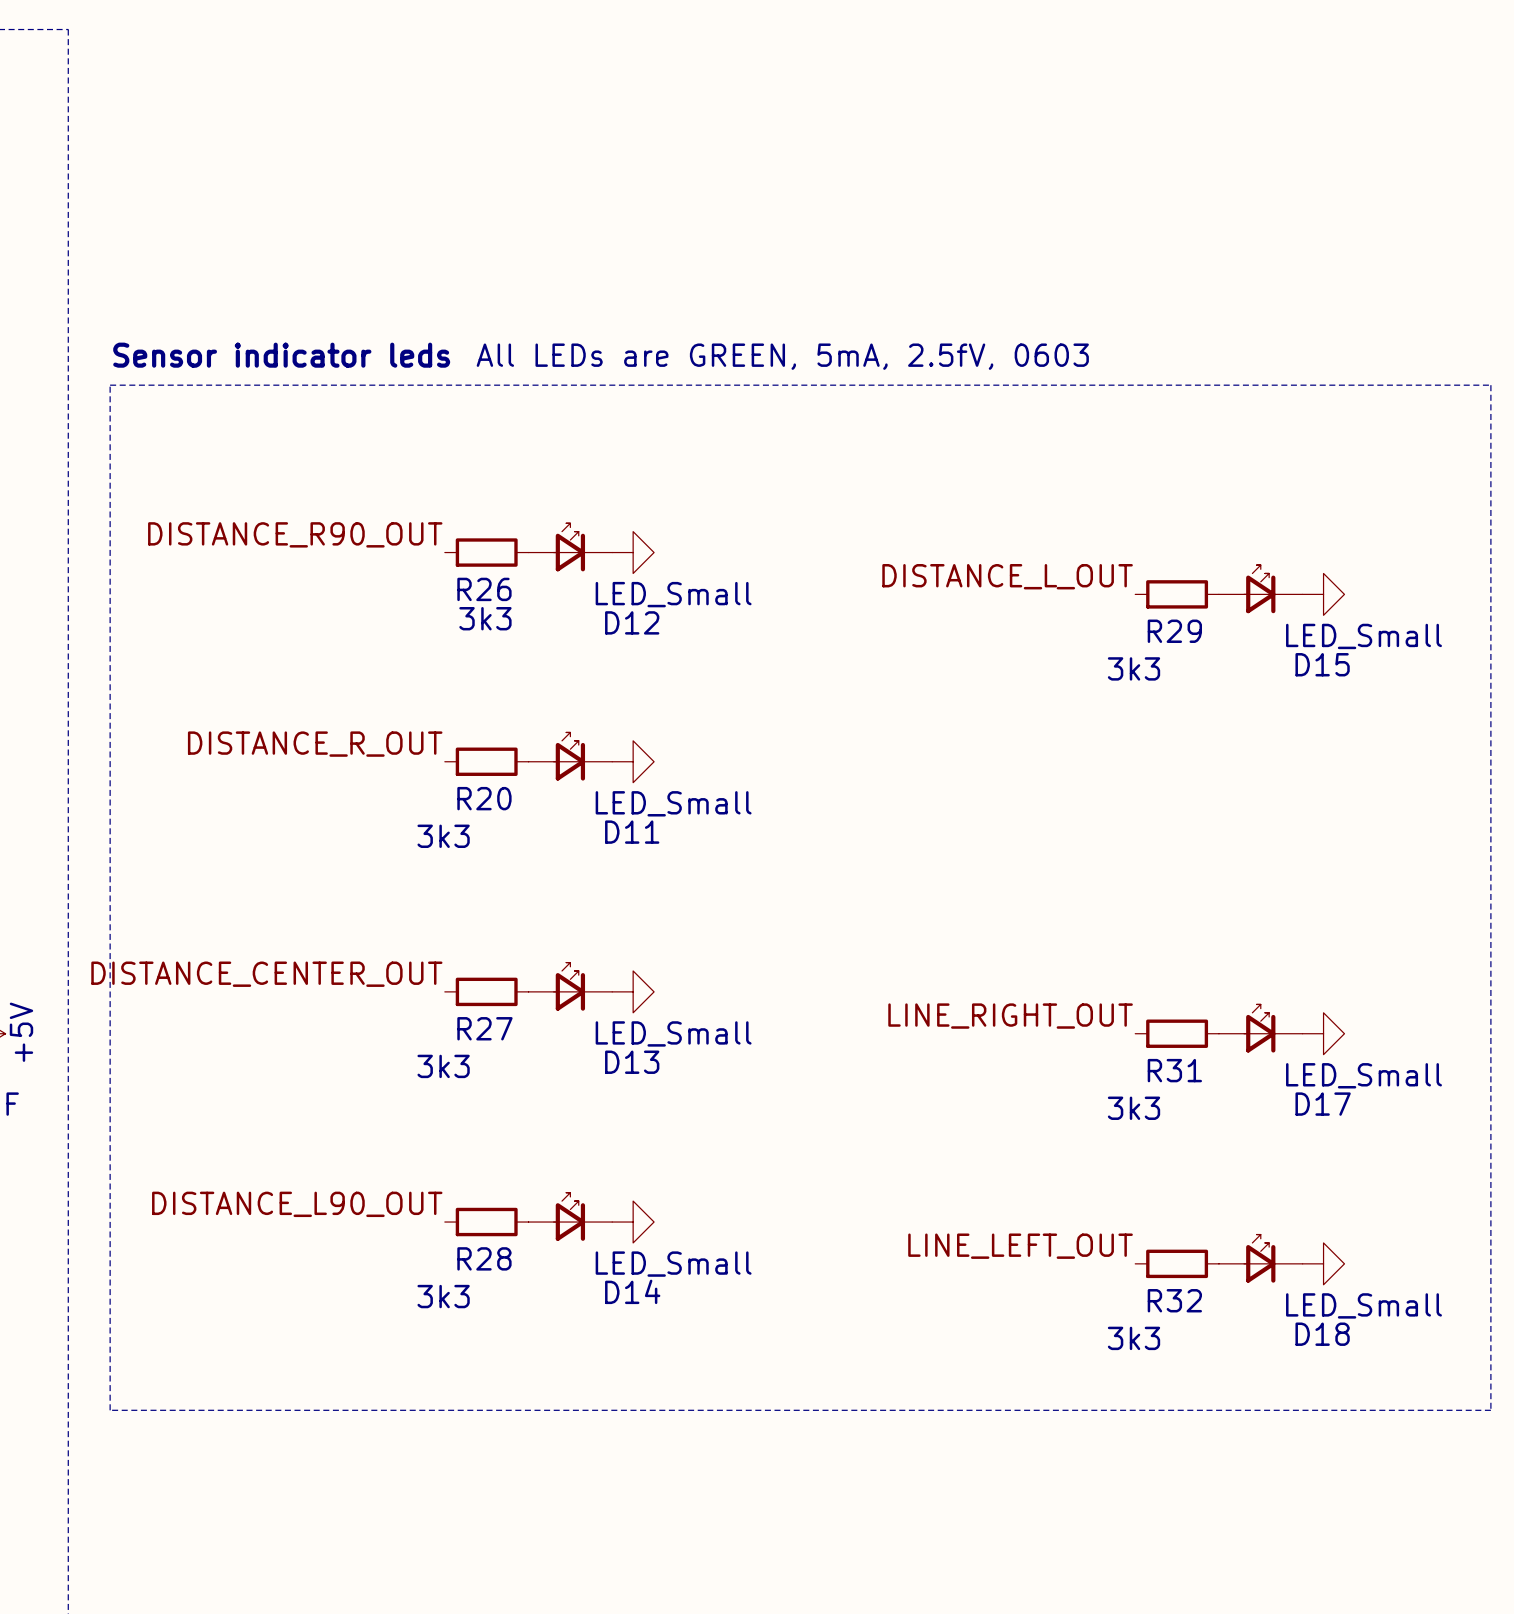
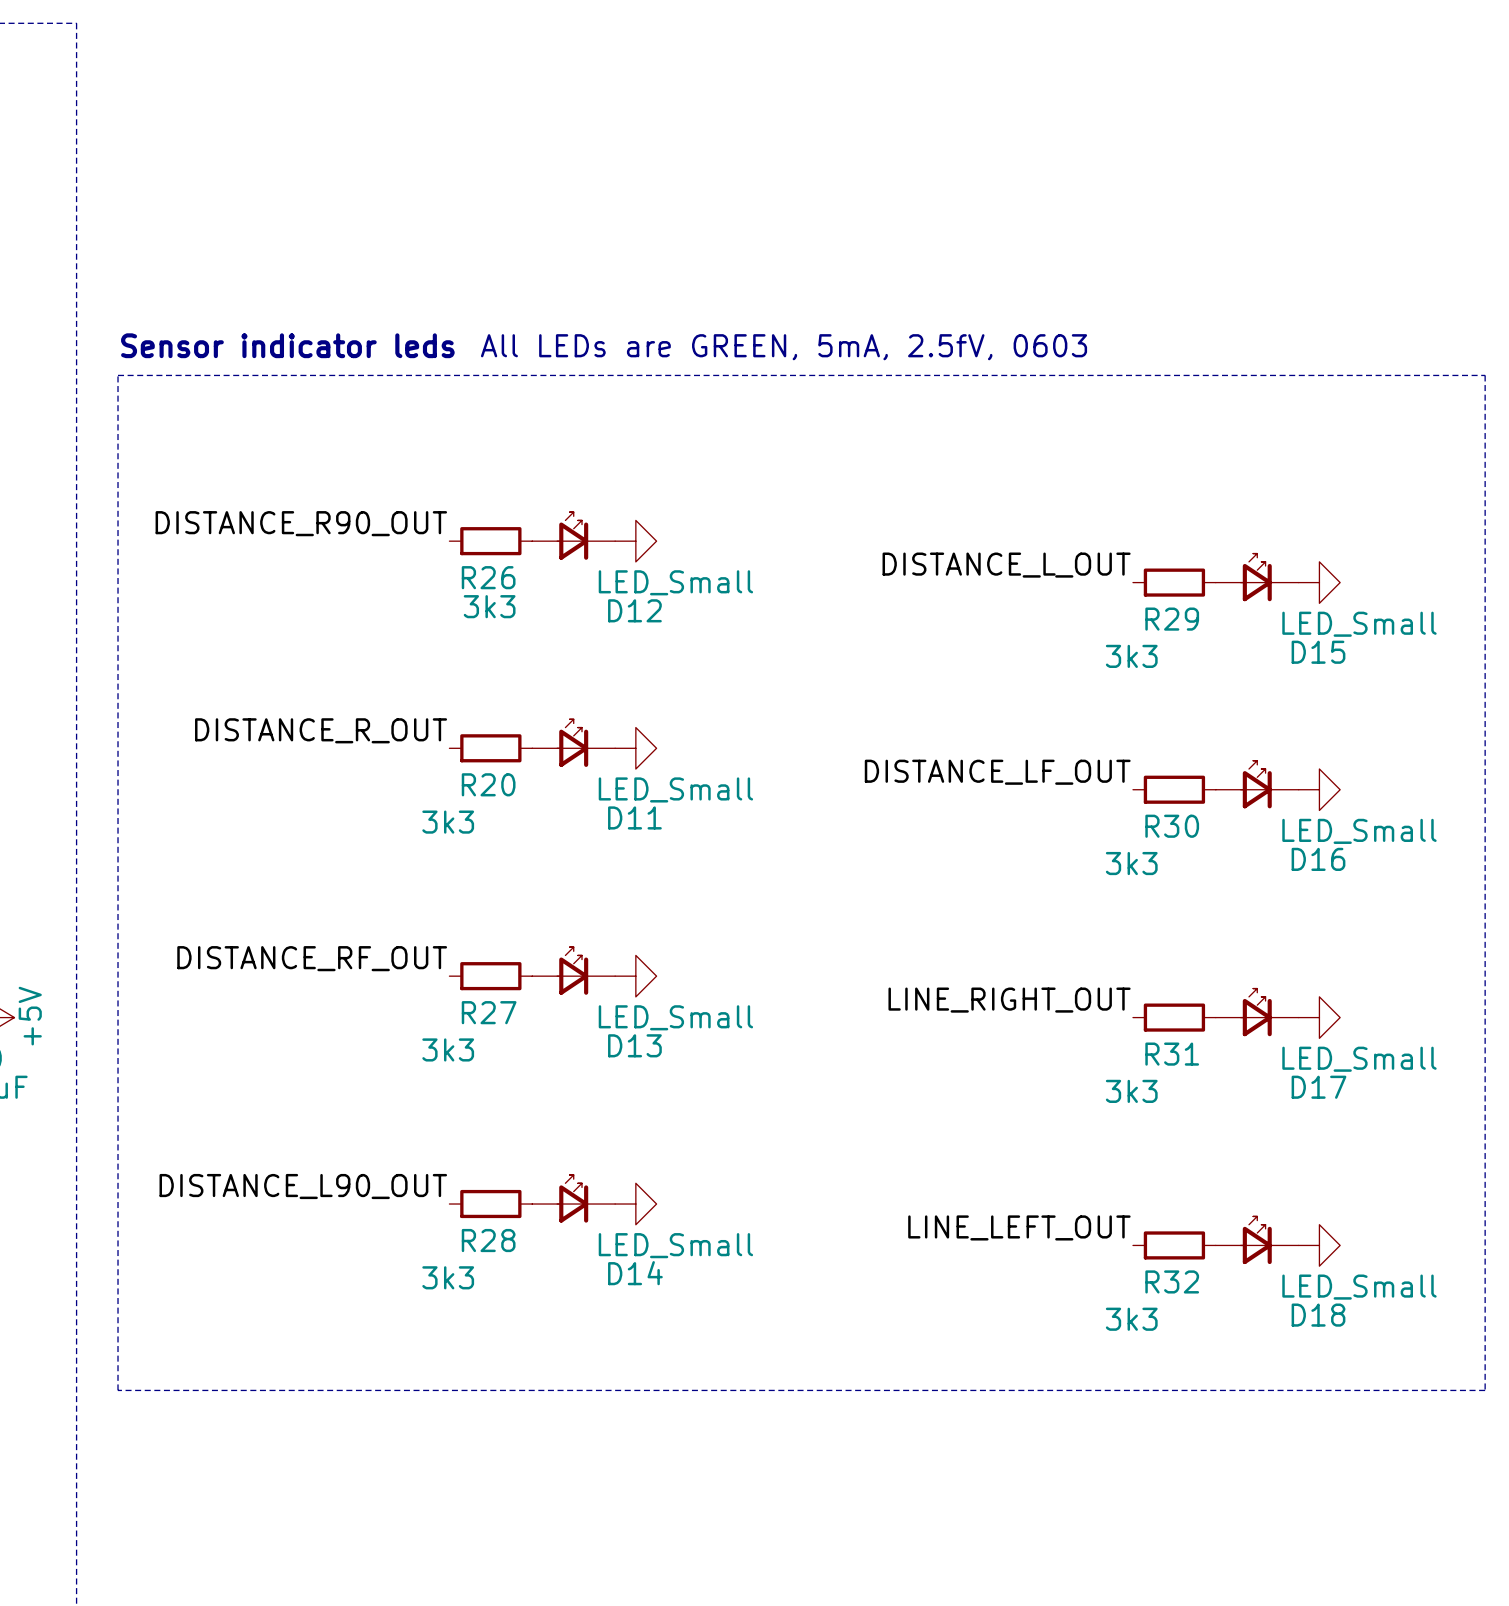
label: none -> DISTANCE_LF_OUT (997, 772)
D16: none -> LED_Small (1257, 784)
R30: none -> 3k3 (1174, 789)
power symbol: none -> (1319, 789)
label: DISTANCE_CENTER_OUT (266, 974) -> DISTANCE_RF_OUT (312, 958)

